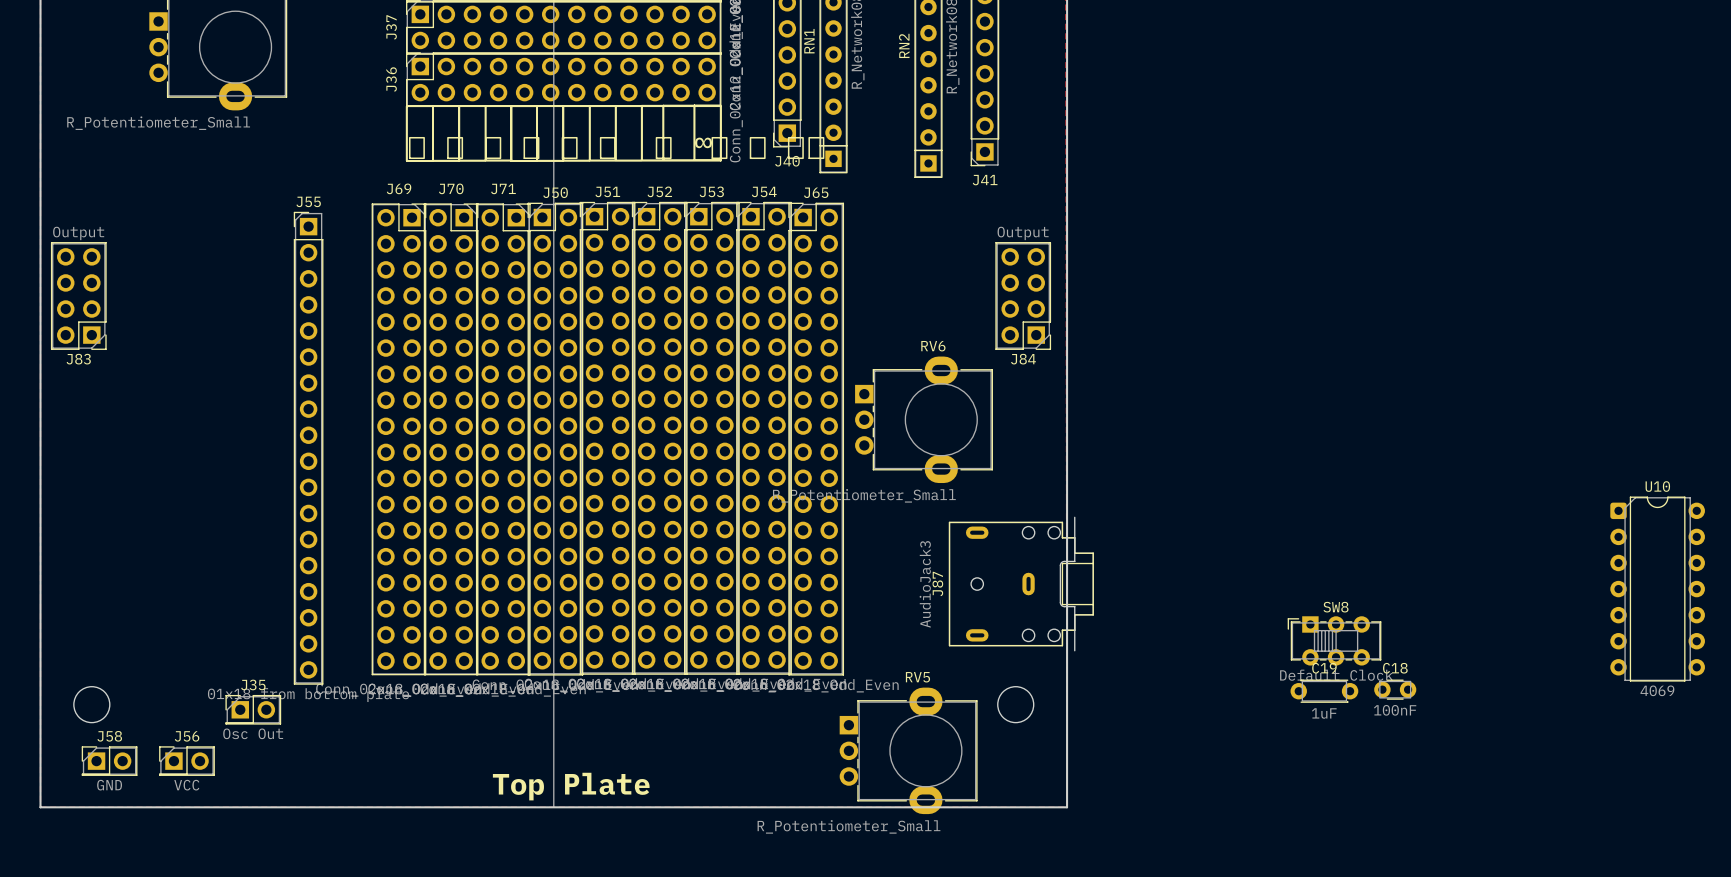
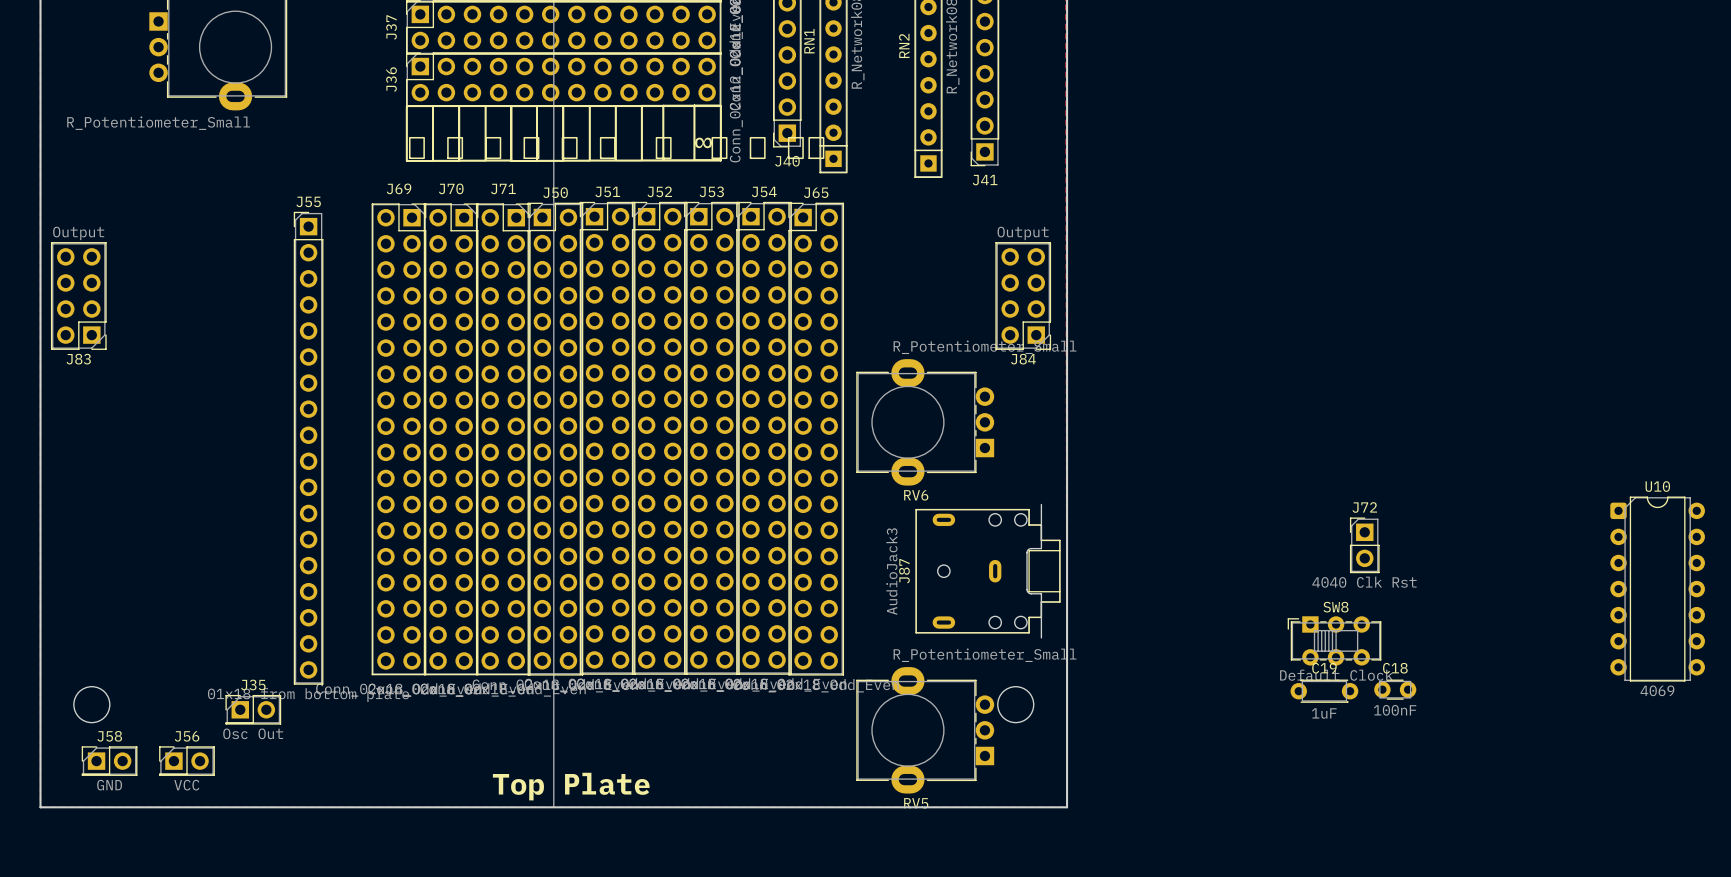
RV6 rotation: 0° (924, 419) -> 180° (925, 422)
J72: none -> 4040 Clk Rst (1364, 545)
J87 position: (1021, 584) -> (988, 571)
RV5 rotation: 0° (908, 750) -> 180° (925, 730)

